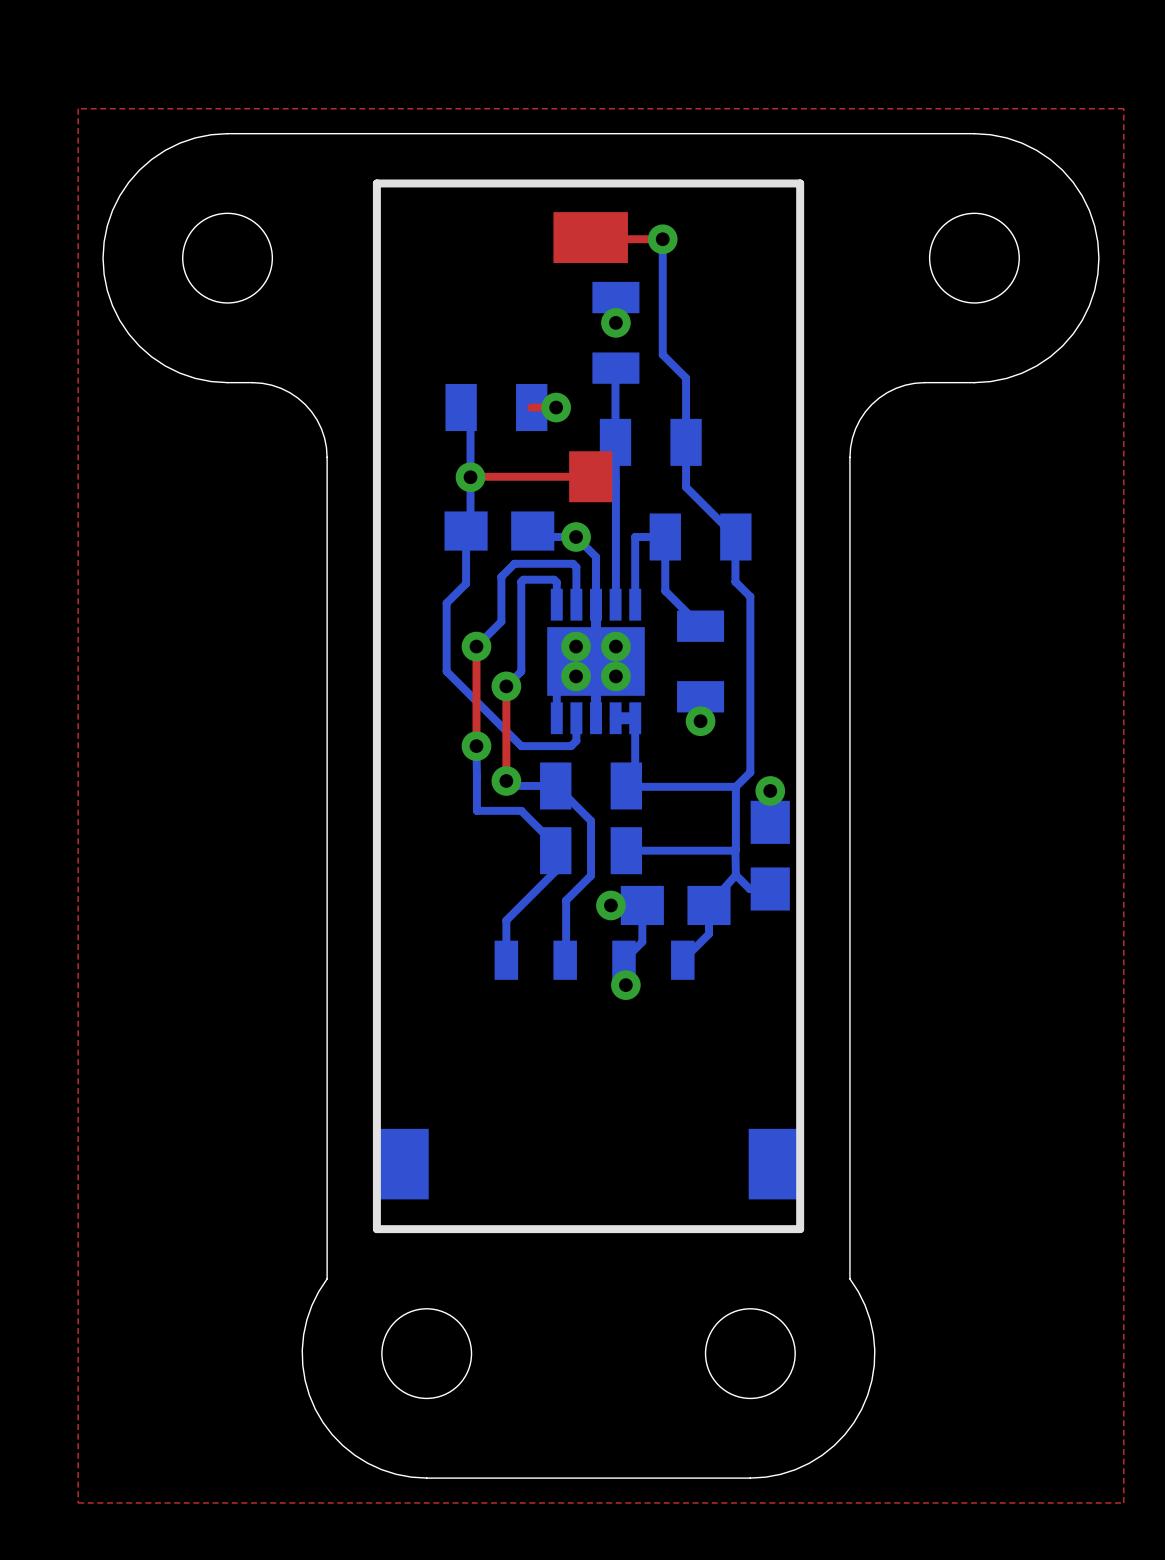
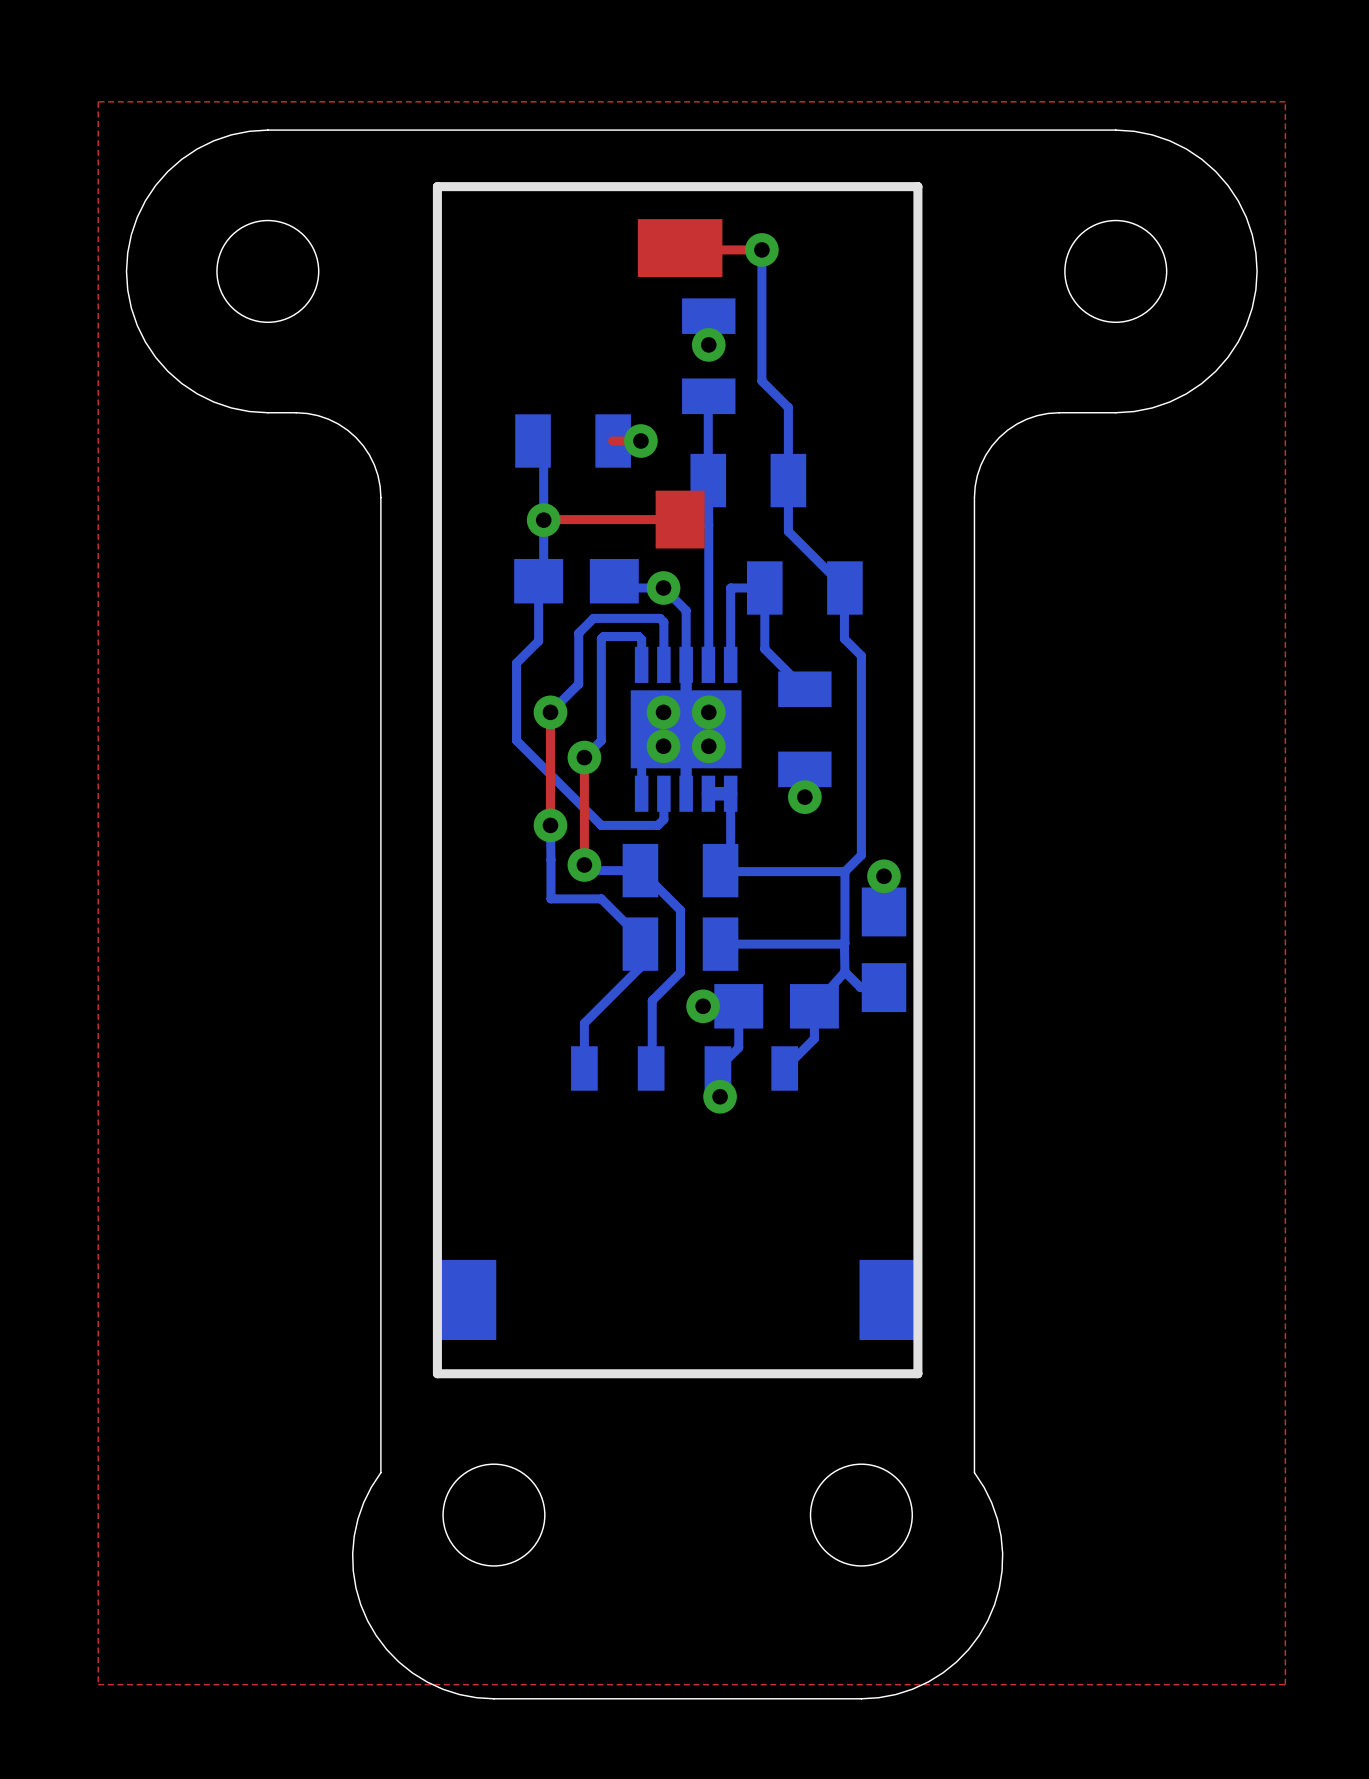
board edge: (327, 1278) (311, 1305) (303, 1334) (302, 1365) (309, 1395) (315, 1409) (332, 1434) (354, 1455) (367, 1463) (396, 1474) (426, 1478) (750, 1478) (780, 1474) (809, 1463) (822, 1455) (844, 1434) (861, 1409) (871, 1380) (874, 1365) (873, 1334) (865, 1305) (849, 1278) -> (380, 1430) (380, 1472) (363, 1502) (354, 1536) (353, 1570) (360, 1604) (367, 1620) (386, 1649) (412, 1672) (427, 1682) (459, 1694) (493, 1698) (861, 1698) (895, 1694) (928, 1682) (942, 1672) (968, 1649) (987, 1620) (999, 1587) (1002, 1570) (1001, 1536) (991, 1502) (974, 1472) (974, 1430)

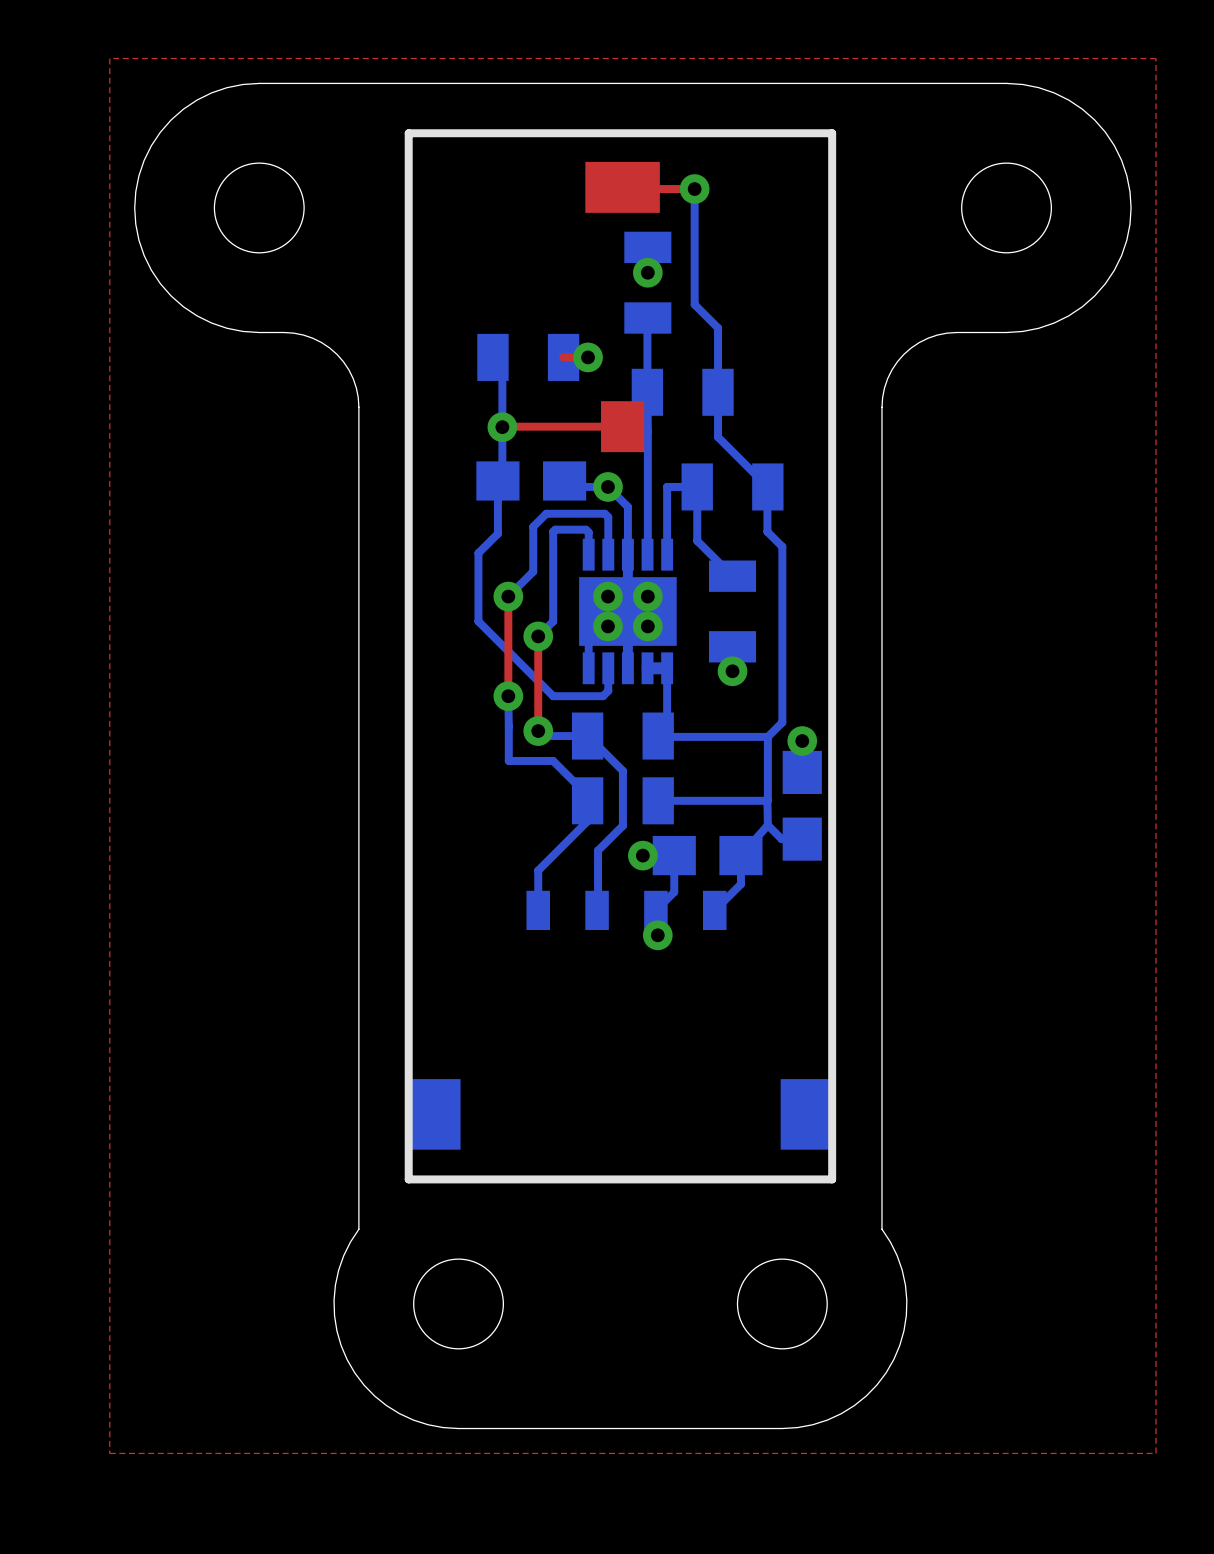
board edge: (380, 1430) (380, 1472) (363, 1502) (354, 1536) (353, 1570) (360, 1604) (367, 1620) (386, 1649) (412, 1672) (427, 1682) (459, 1694) (493, 1698) (861, 1698) (895, 1694) (928, 1682) (942, 1672) (968, 1649) (987, 1620) (999, 1587) (1002, 1570) (1001, 1536) (991, 1502) (974, 1472) (974, 1430) -> (358, 1229) (343, 1255) (335, 1285) (334, 1315) (341, 1345) (347, 1359) (364, 1385) (386, 1405) (399, 1413) (428, 1424) (458, 1428) (782, 1428) (812, 1424) (841, 1413) (854, 1405) (876, 1385) (893, 1359) (903, 1330) (906, 1315) (905, 1285) (897, 1255) (881, 1229)

